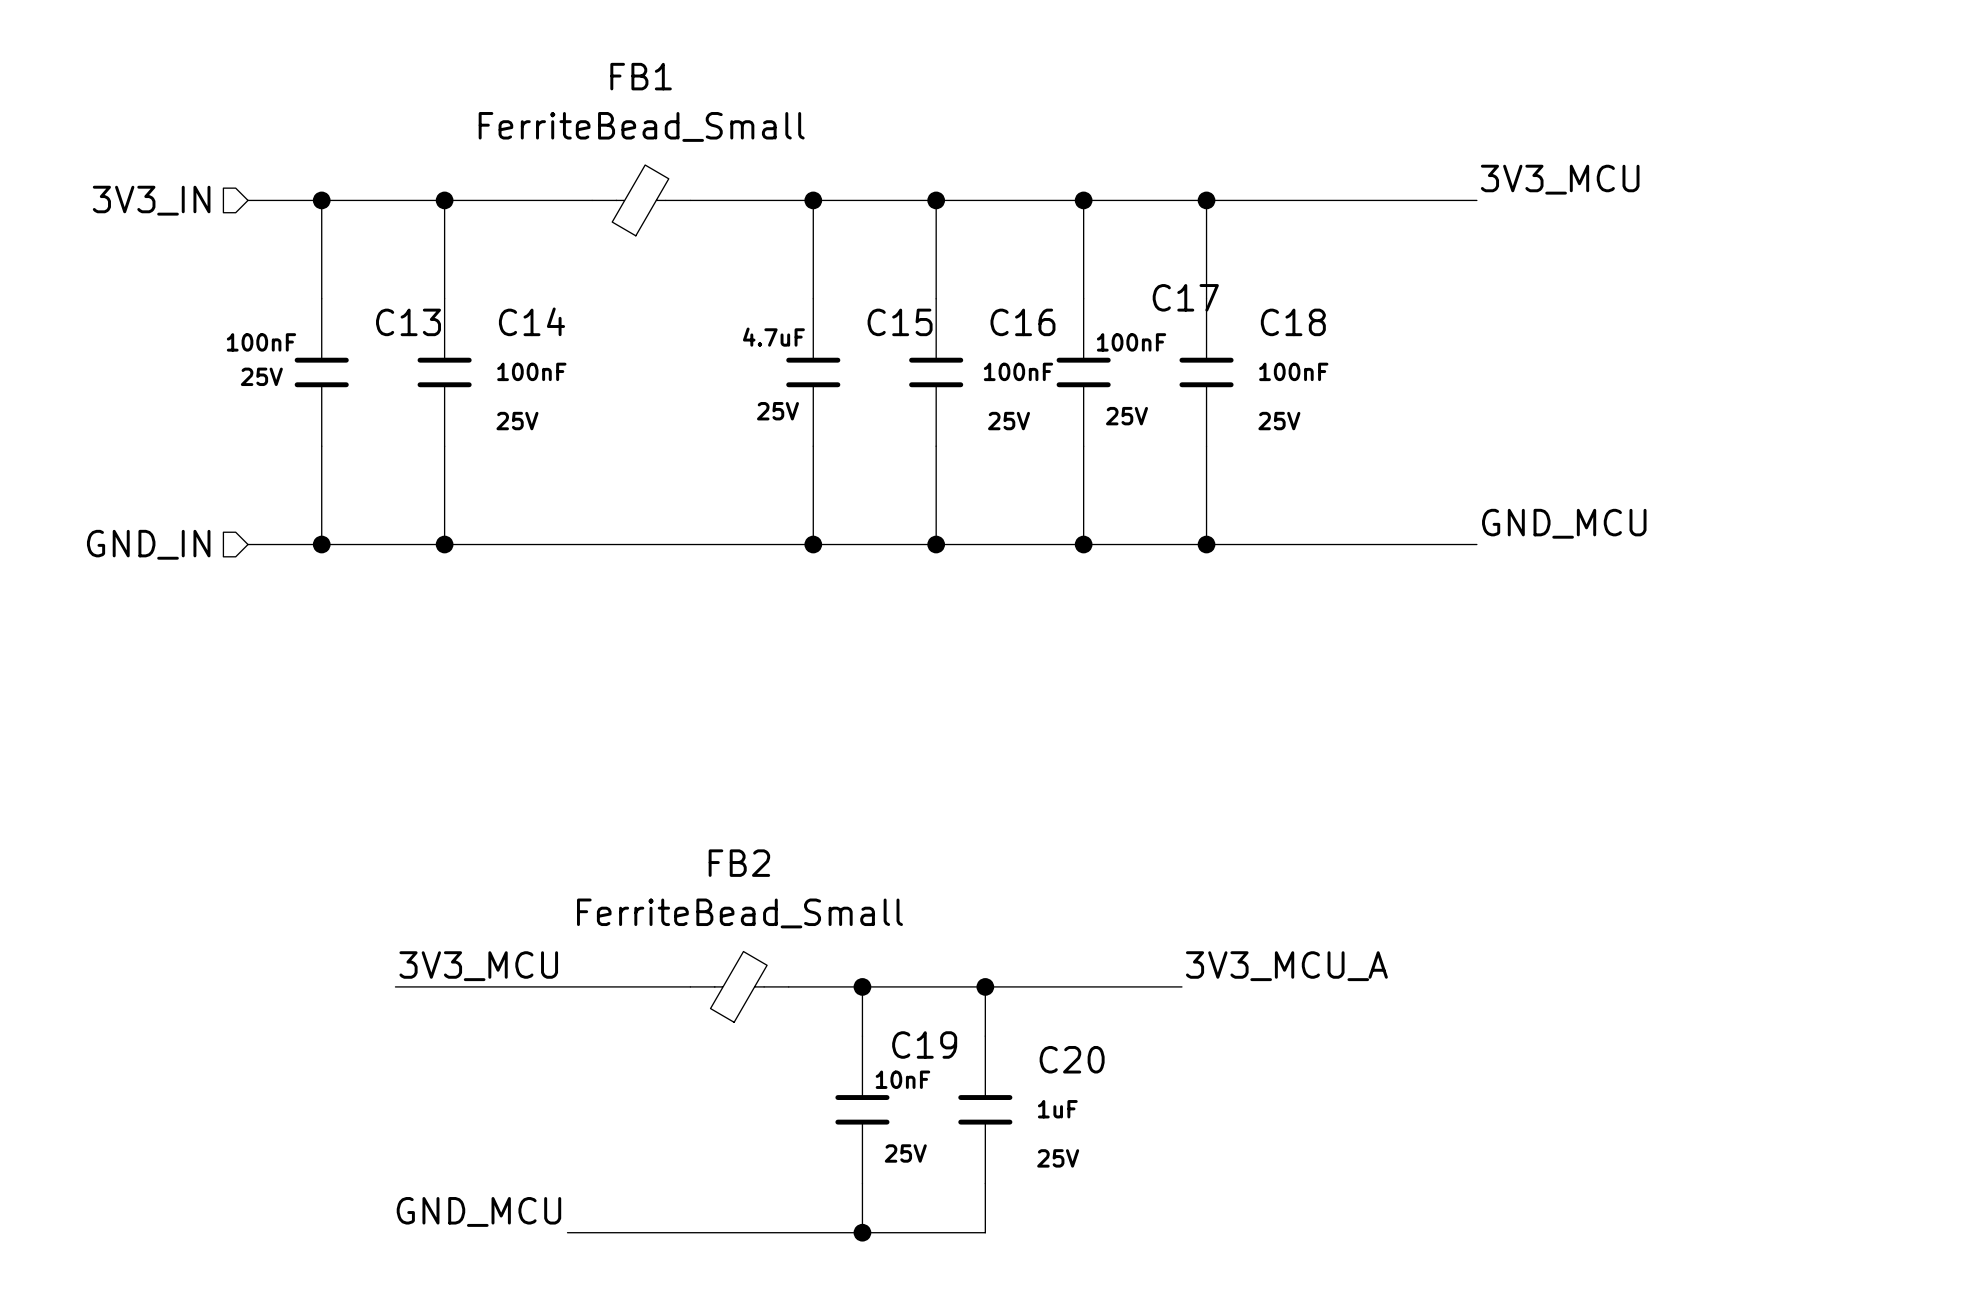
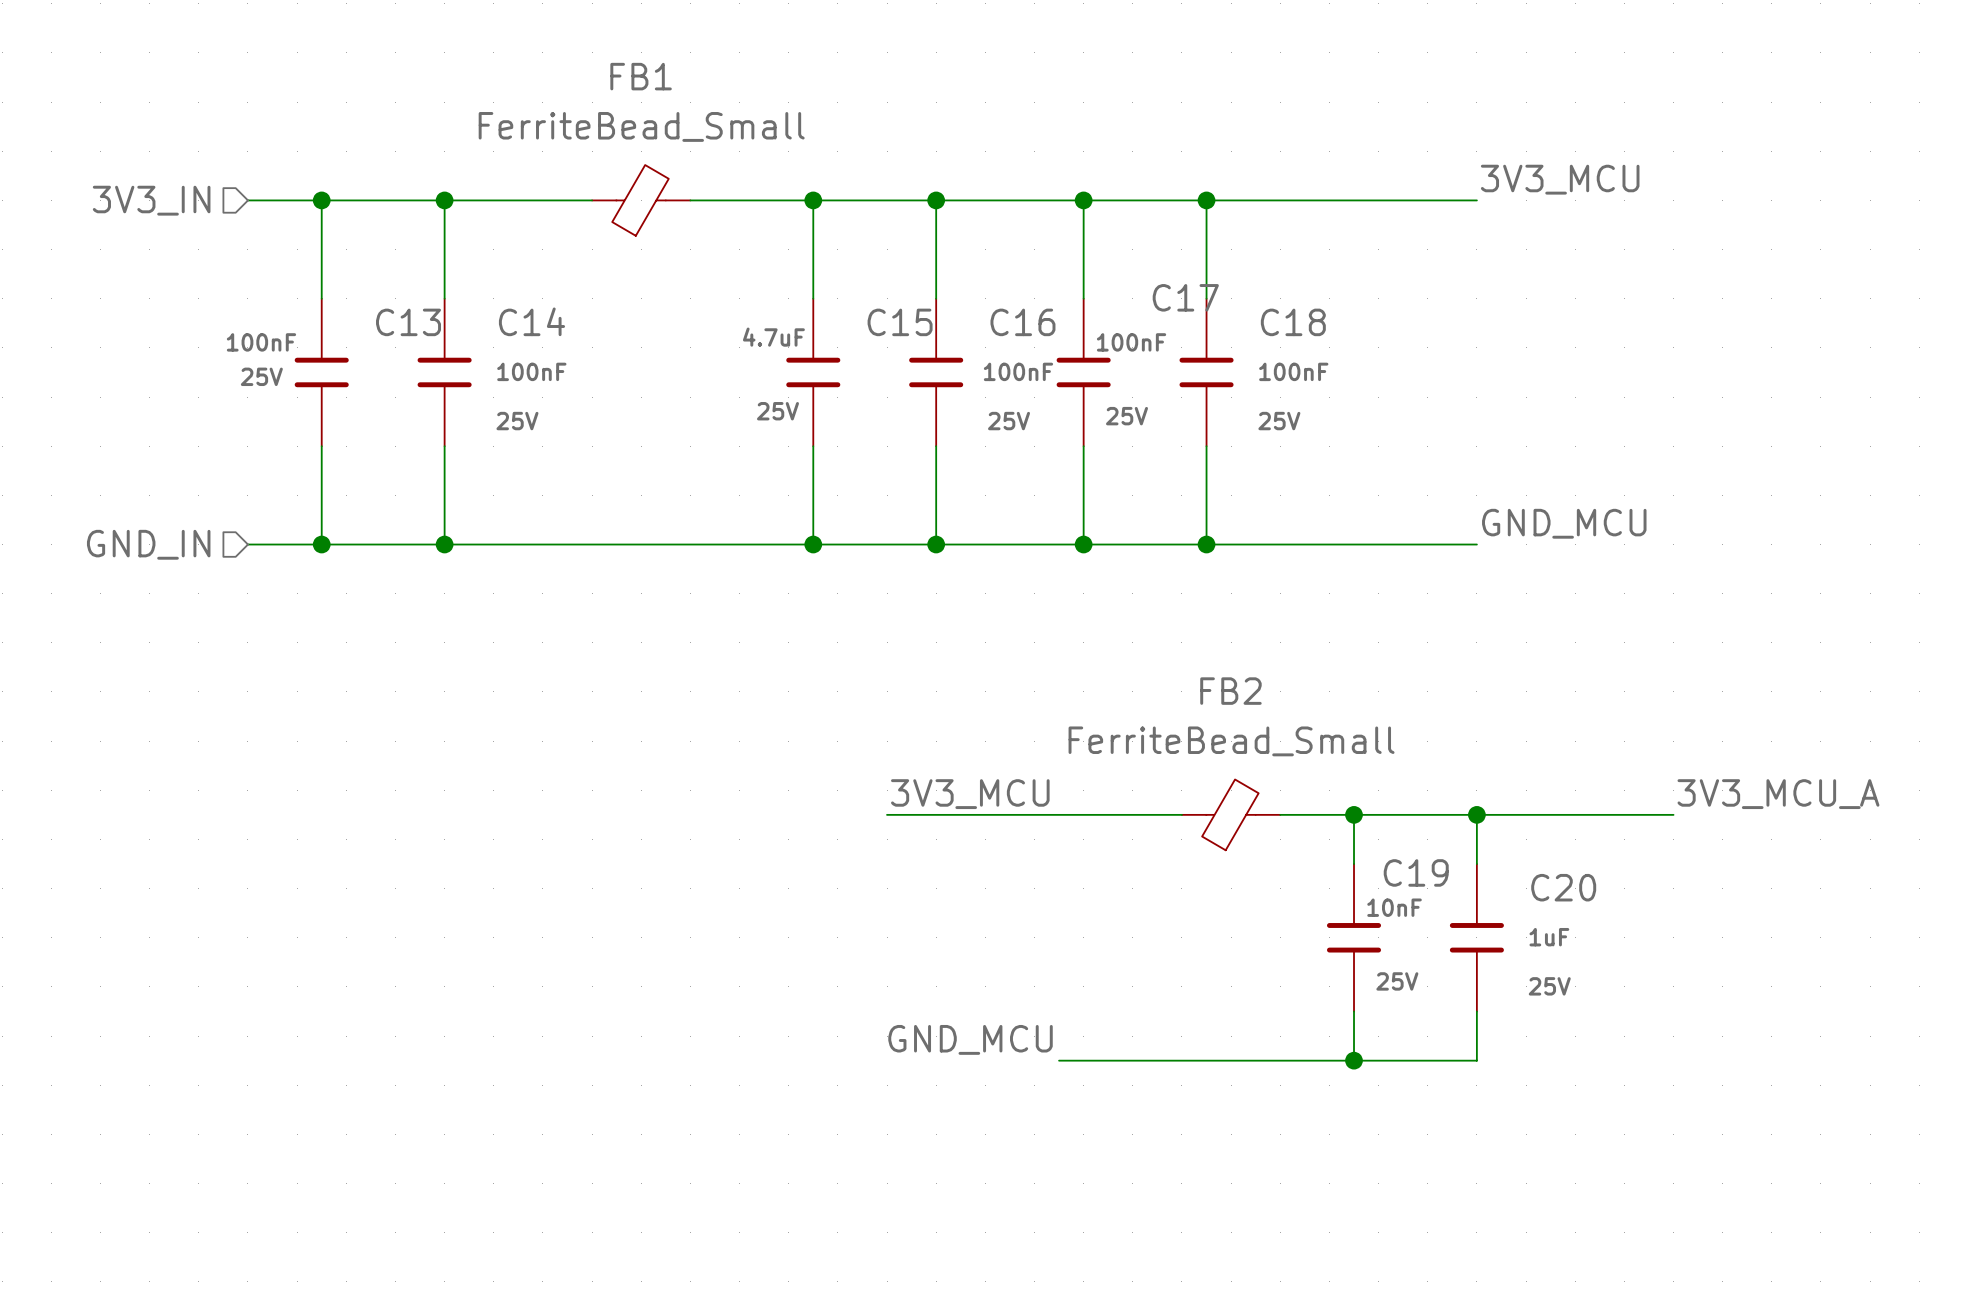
label: none -> 3V3_MCU (970, 794)
label: none -> 3V3_MCU_A (1778, 794)
wire: none -> (887, 814) (1181, 814)
wire: none -> (1280, 814) (1673, 814)
wire: none -> (1354, 814) (1354, 864)
junction: none -> (1354, 814)
wire: none -> (1476, 814) (1476, 864)
junction: none -> (1476, 814)
label: 3V3_MCU (478, 966) -> none
label: 3V3_MCU_A (1286, 966) -> none
wire: (395, 986) (690, 986) -> none
FB2 position: (739, 986) -> (1231, 814)
wire: (788, 986) (1181, 986) -> none
wire: (862, 986) (862, 1036) -> none
junction: (862, 986) -> none
wire: (985, 986) (985, 1036) -> (1354, 1011) (1354, 1060)
junction: (985, 986) -> none
wire: none -> (1476, 1011) (1476, 1060) (1059, 1060)
label: none -> GND_MCU (970, 1039)
junction: none -> (1354, 1060)
C19 position: (862, 1109) -> (1354, 937)
C20 position: (985, 1109) -> (1476, 937)
wire: (862, 1183) (862, 1232) -> none
wire: (985, 1183) (985, 1232) (567, 1232) -> none
label: GND_MCU (478, 1211) -> none
junction: (862, 1232) -> none

